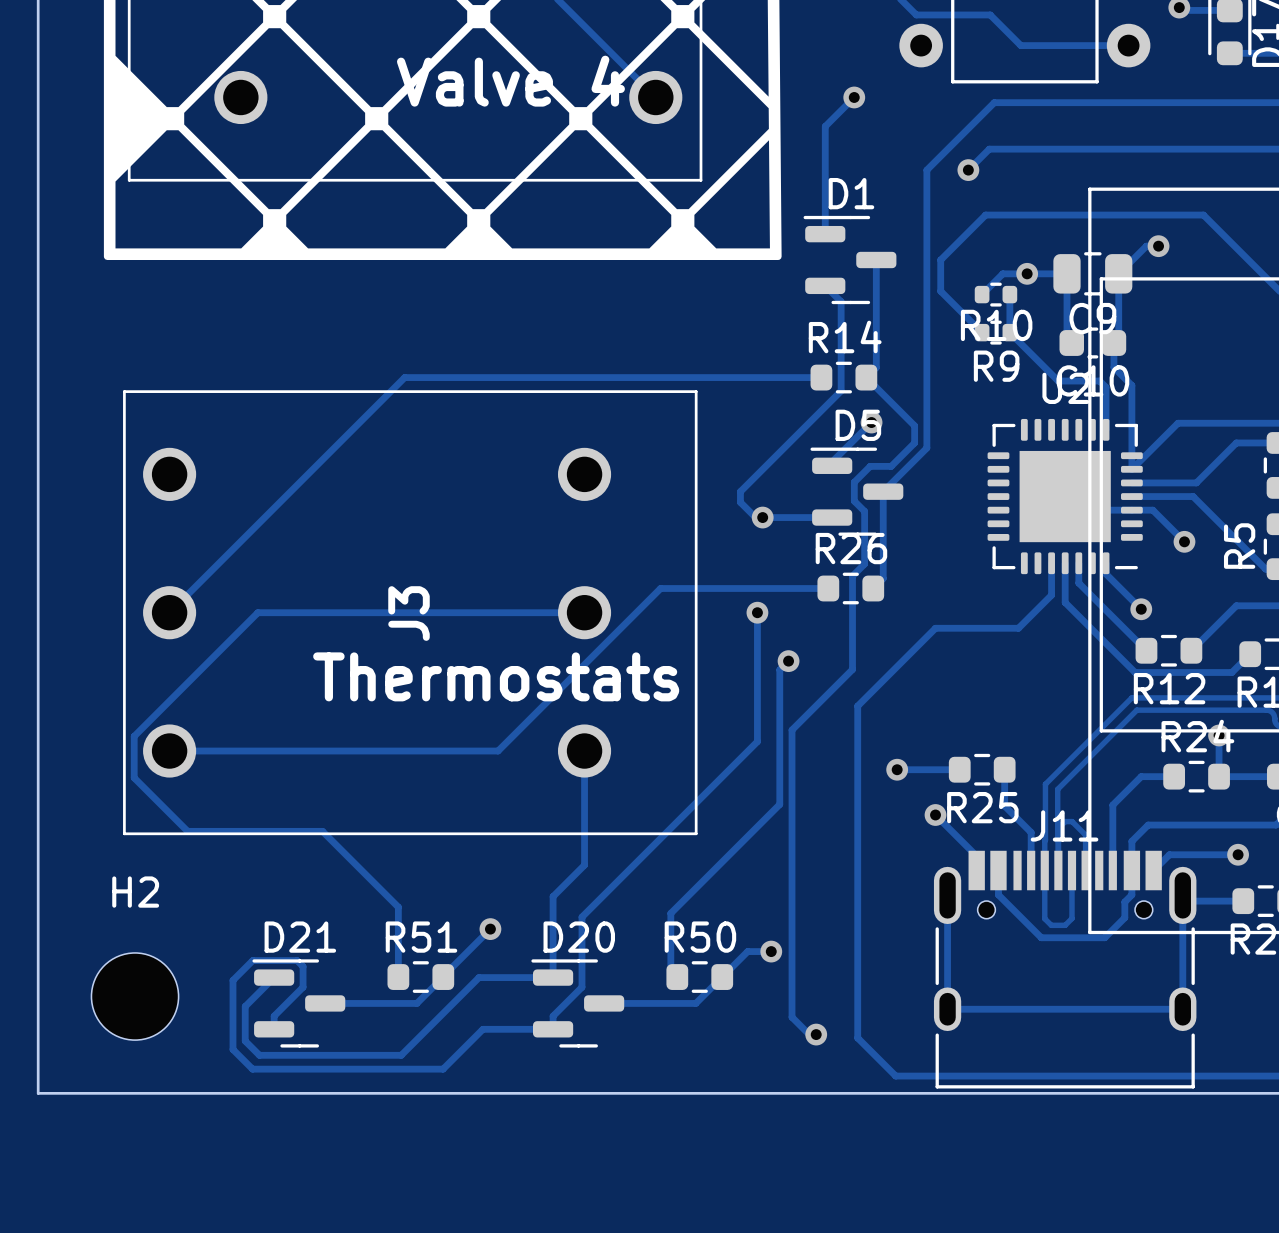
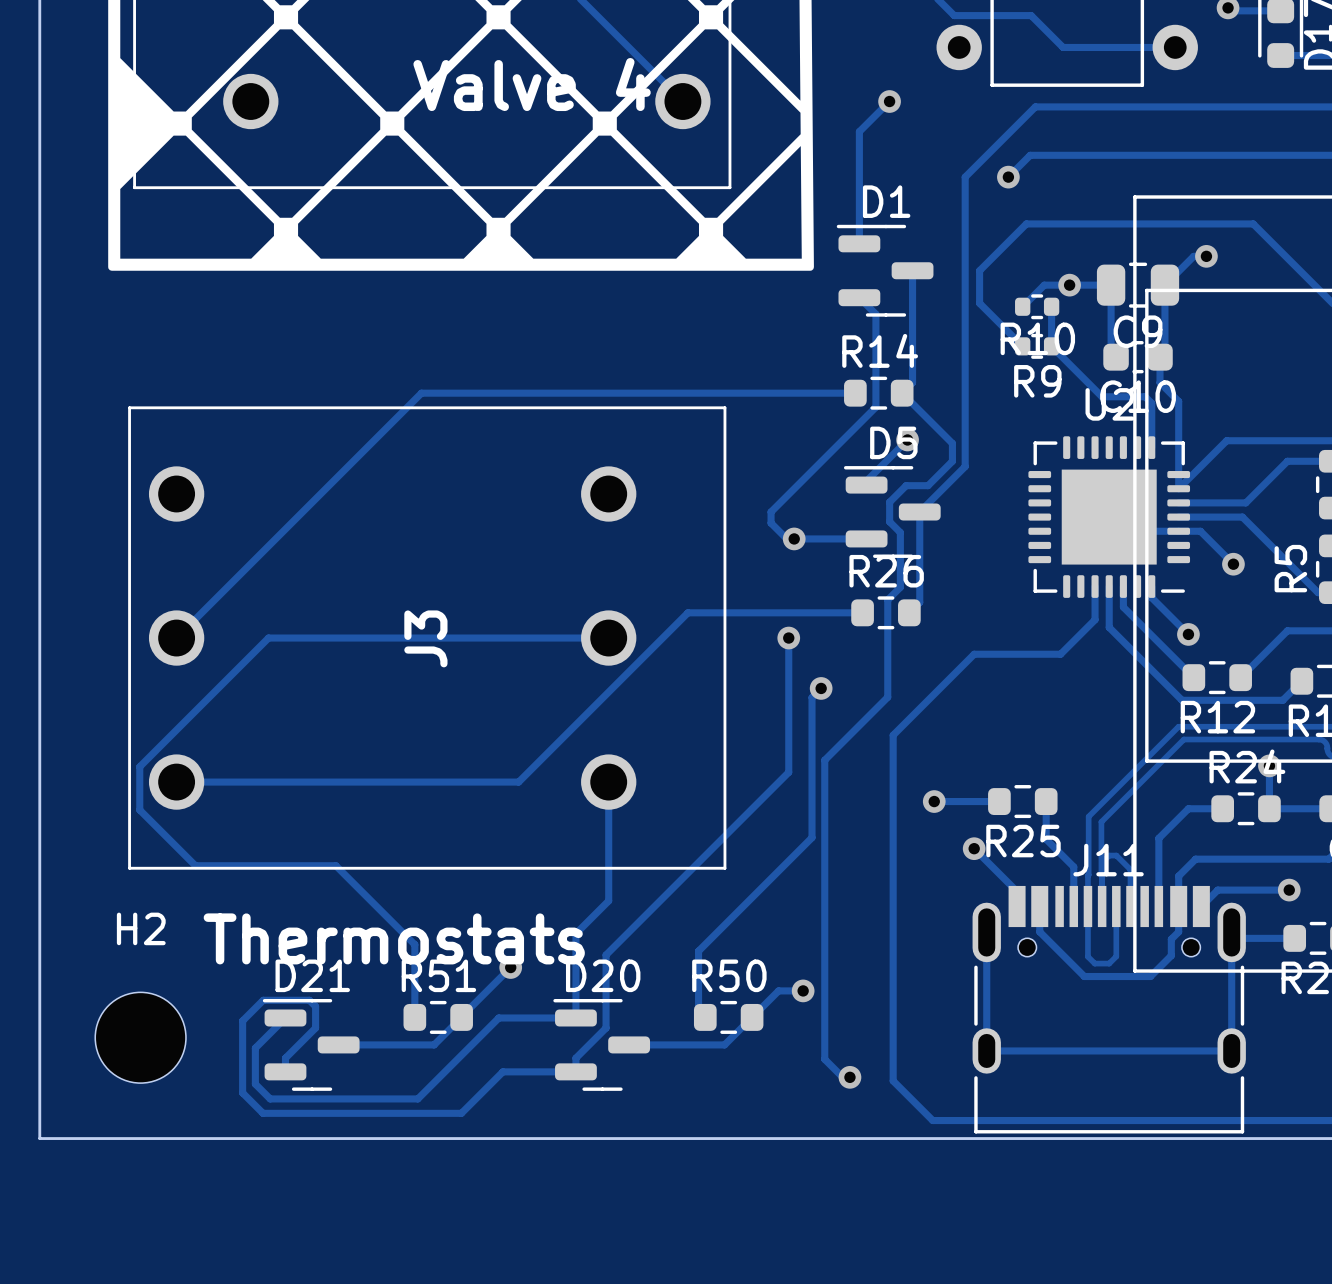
text position: Thermostats (496, 676) -> Thermostats (394, 938)

